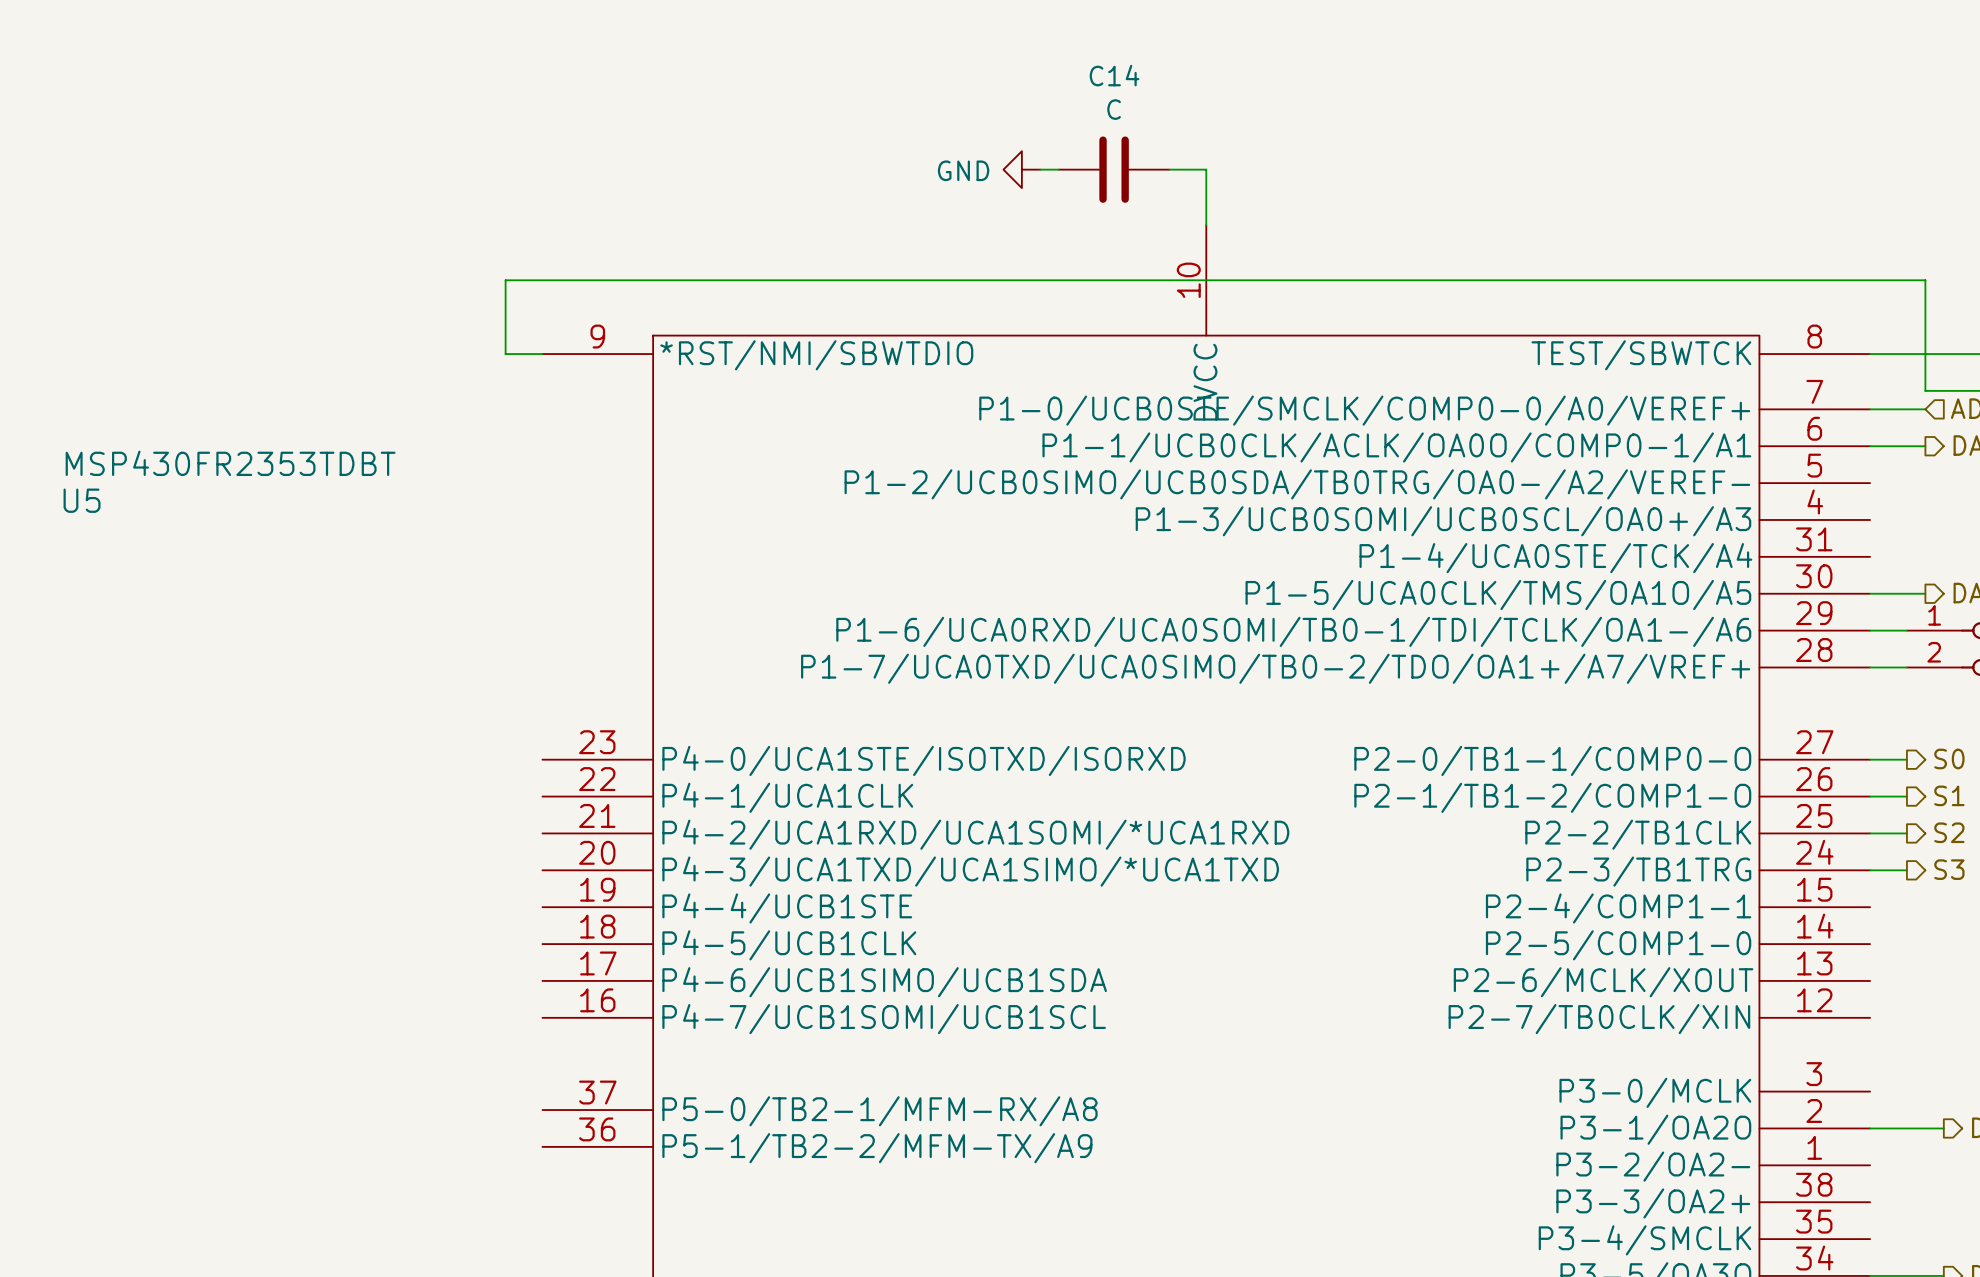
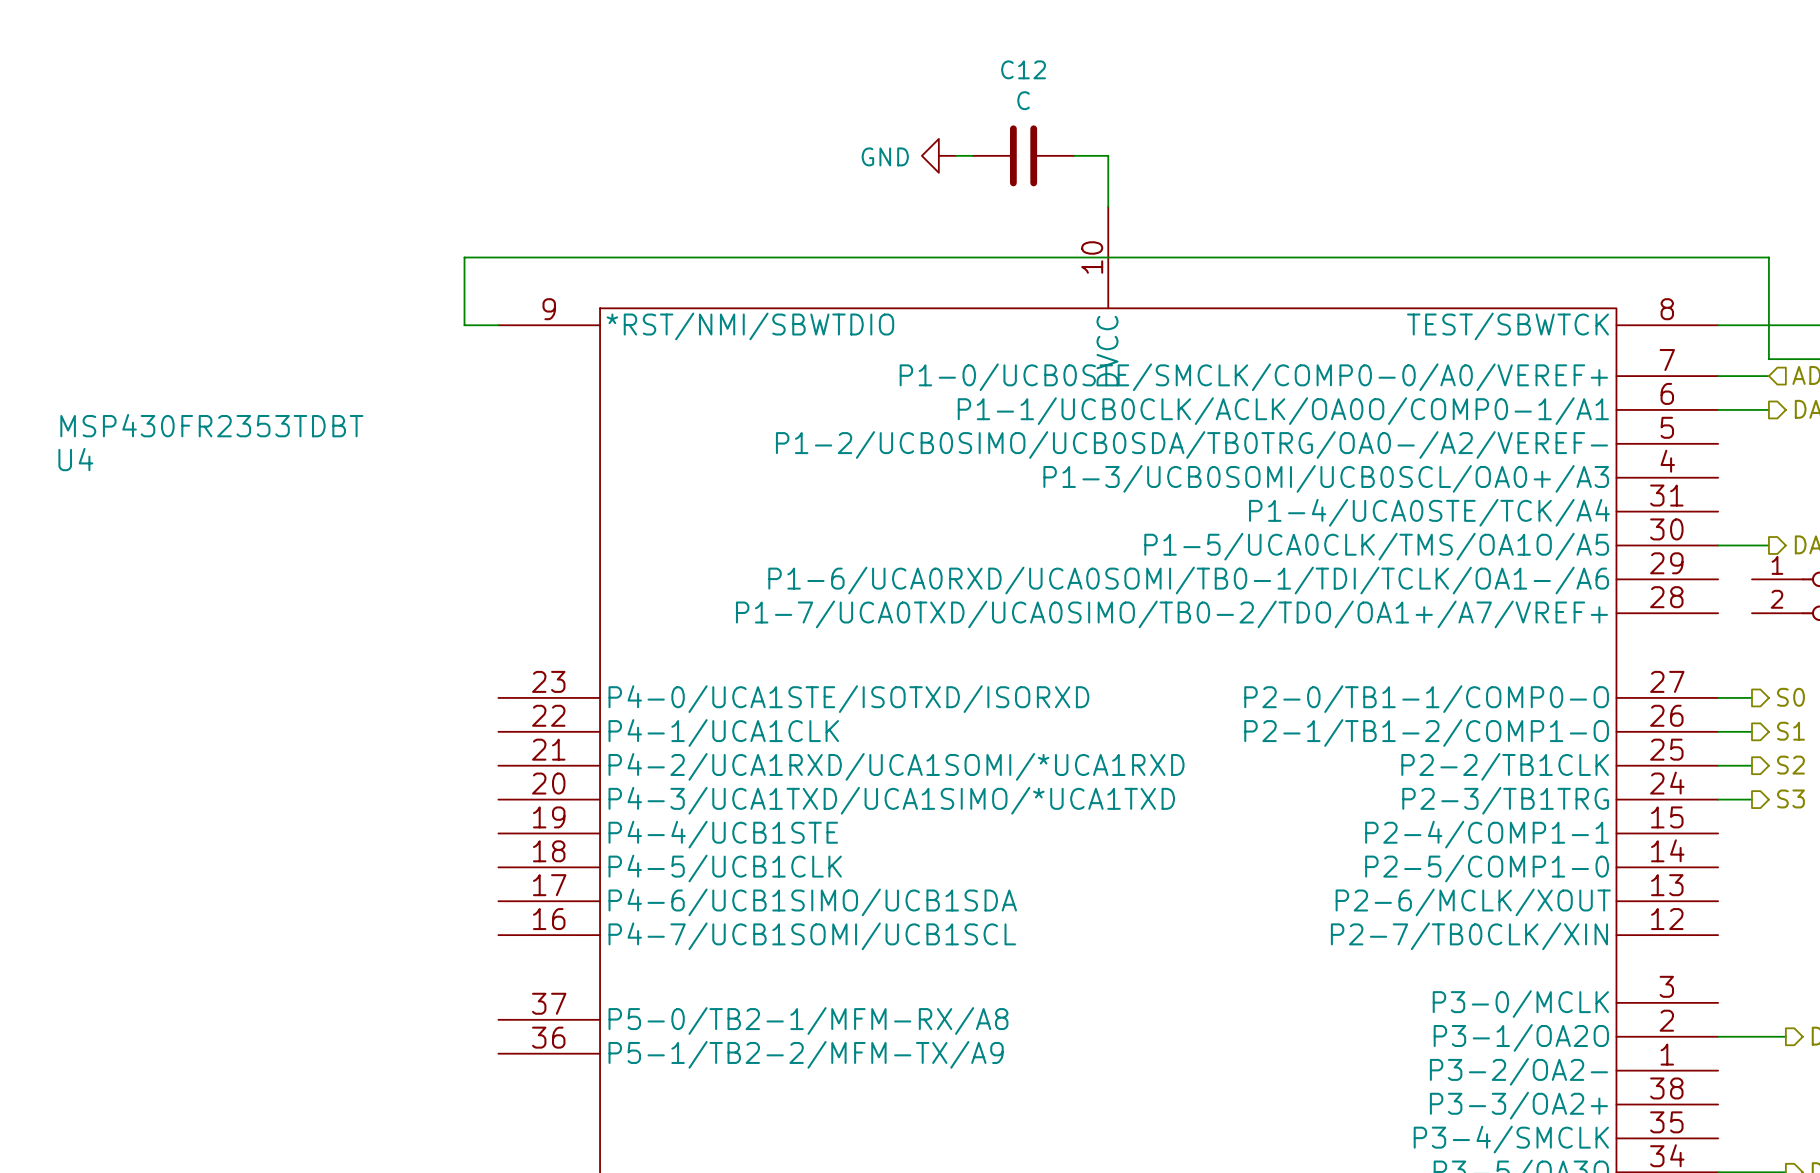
C14 name: C14 (1114, 75) -> C12 (1023, 69)
U5 name: U5 (82, 500) -> U4 (75, 459)
wire: (1870, 630) (1906, 630) -> none
wire: (1870, 667) (1906, 667) -> none

